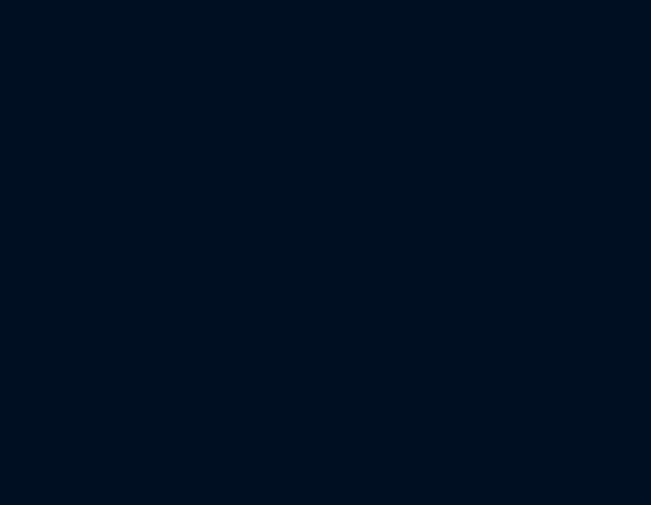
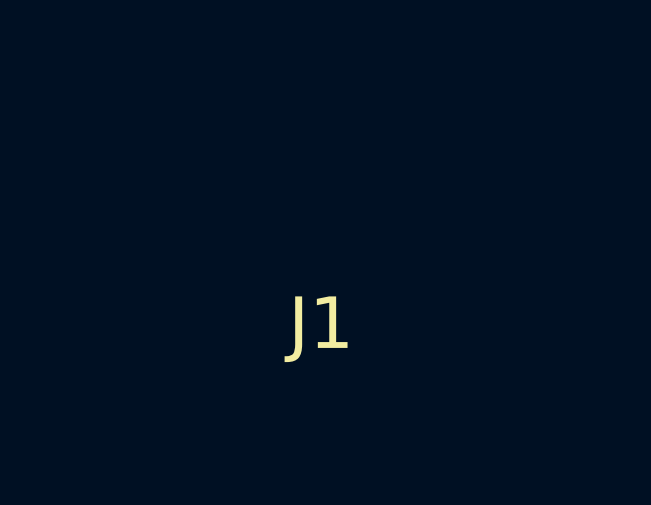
J1: none -> (316, 329)

